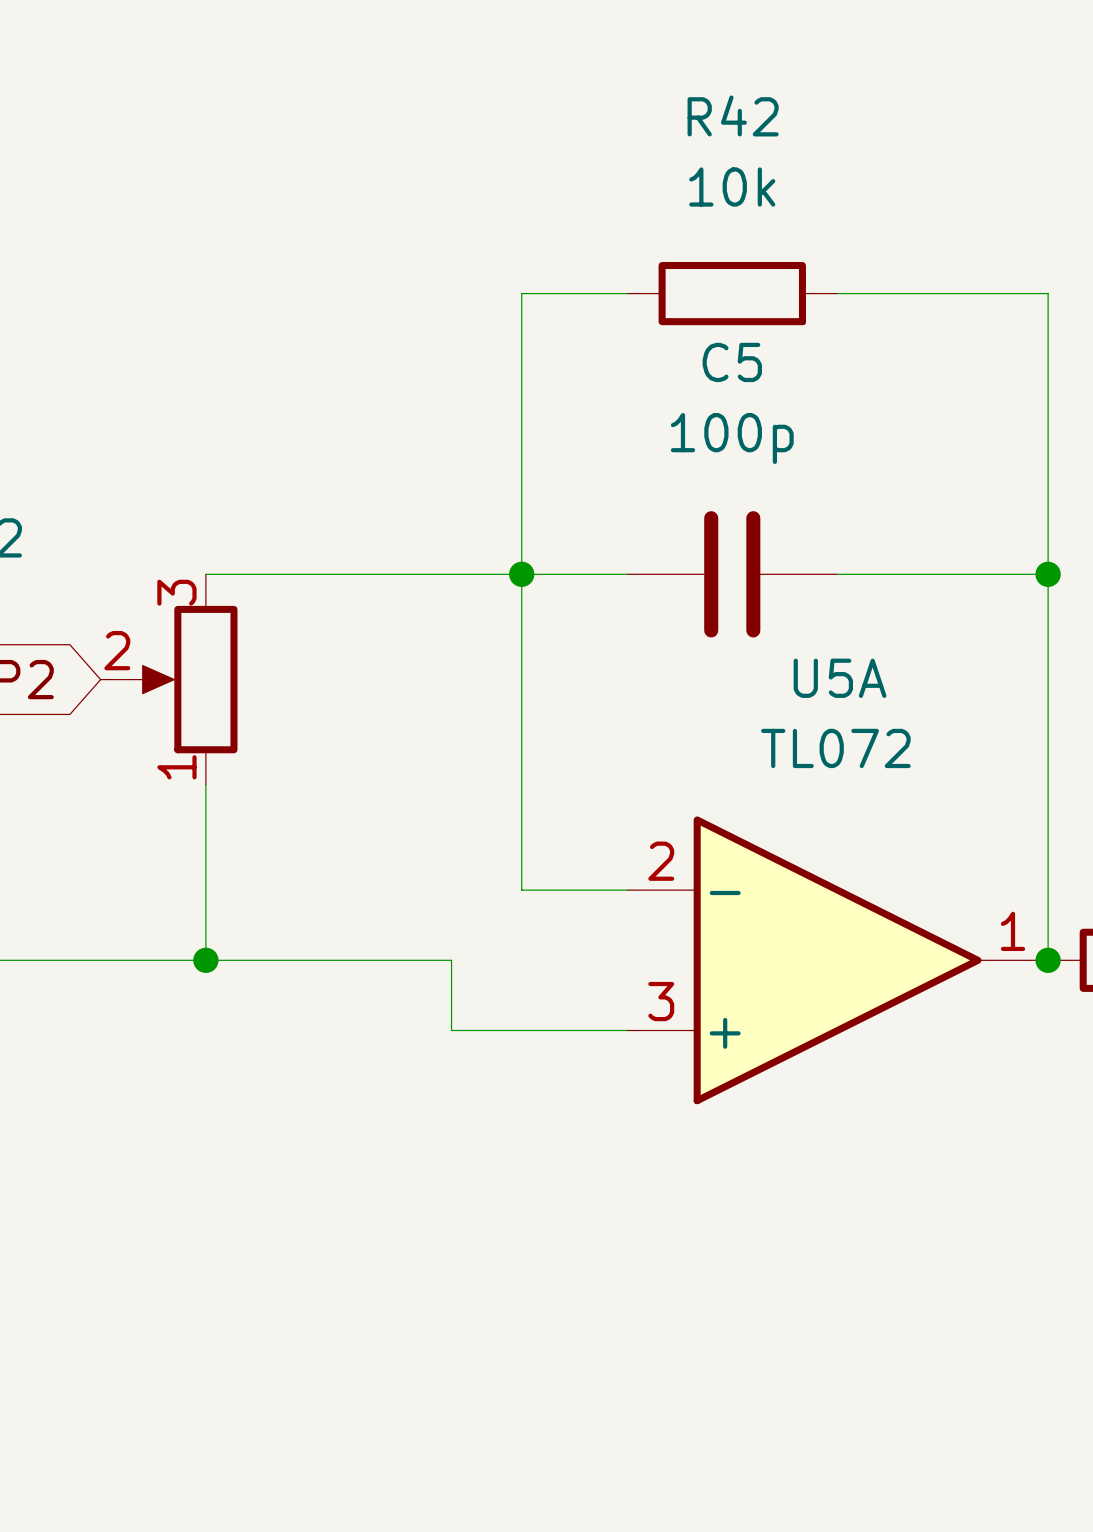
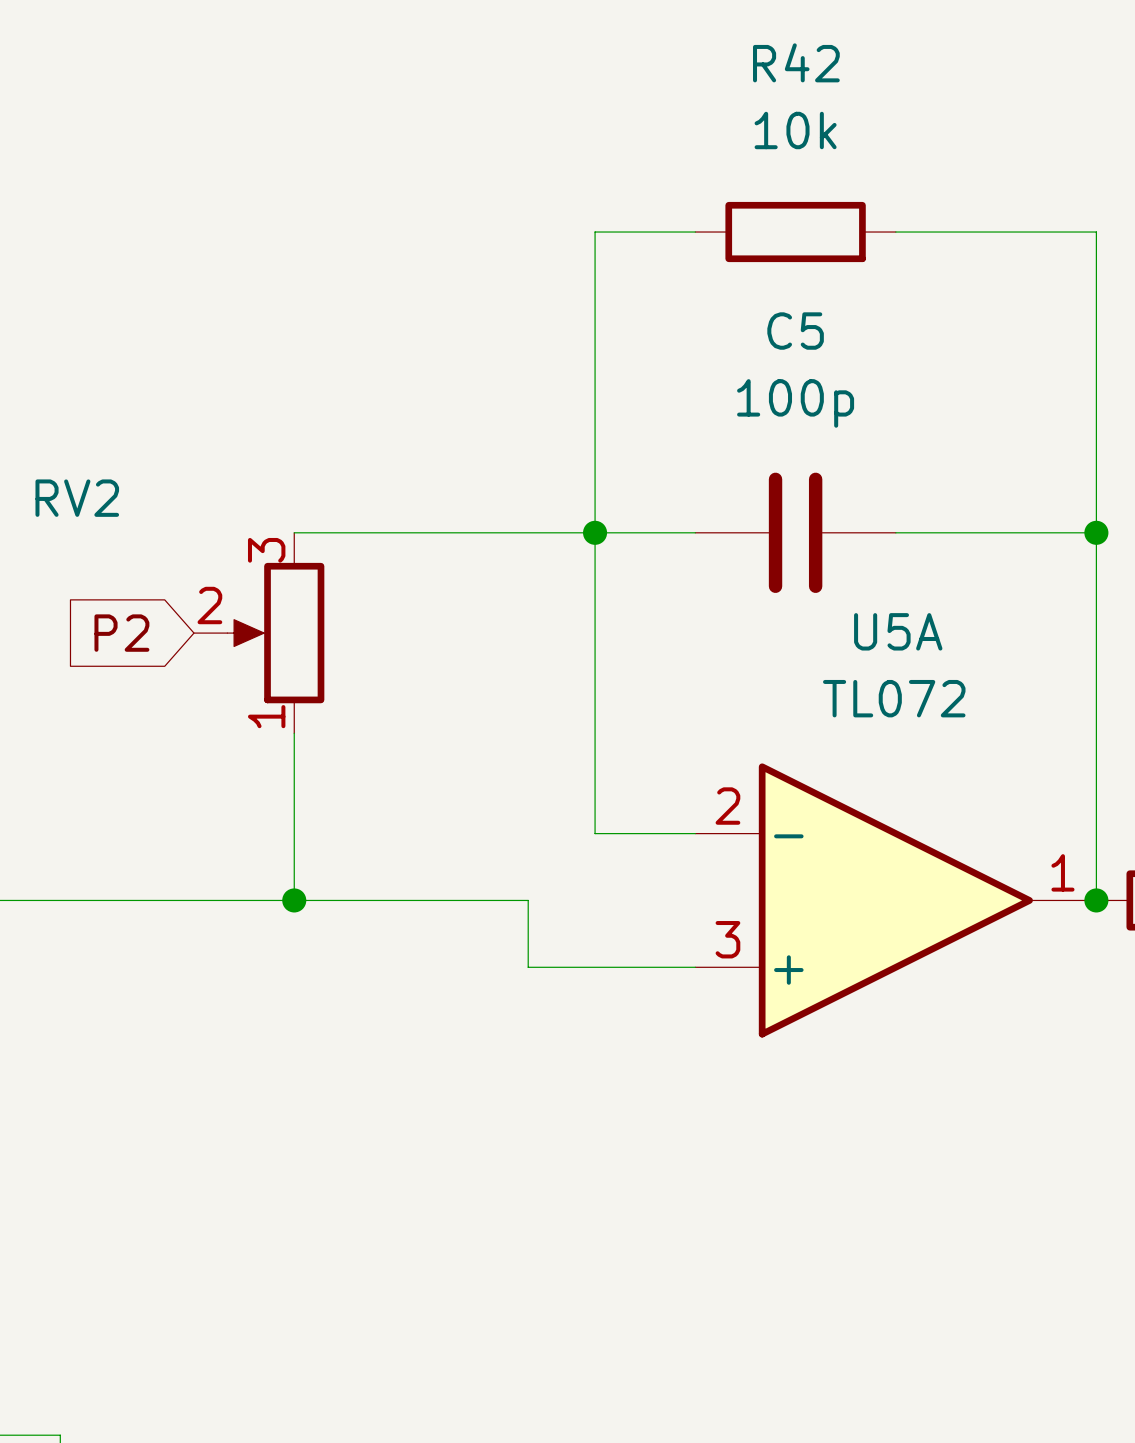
wire: (521, 293) (627, 293) -> (595, 265) (595, 232) (695, 232)
R42 position: (732, 293) -> (795, 232)
wire: (837, 293) (1048, 293) -> (895, 232) (1096, 232) (1096, 265)

